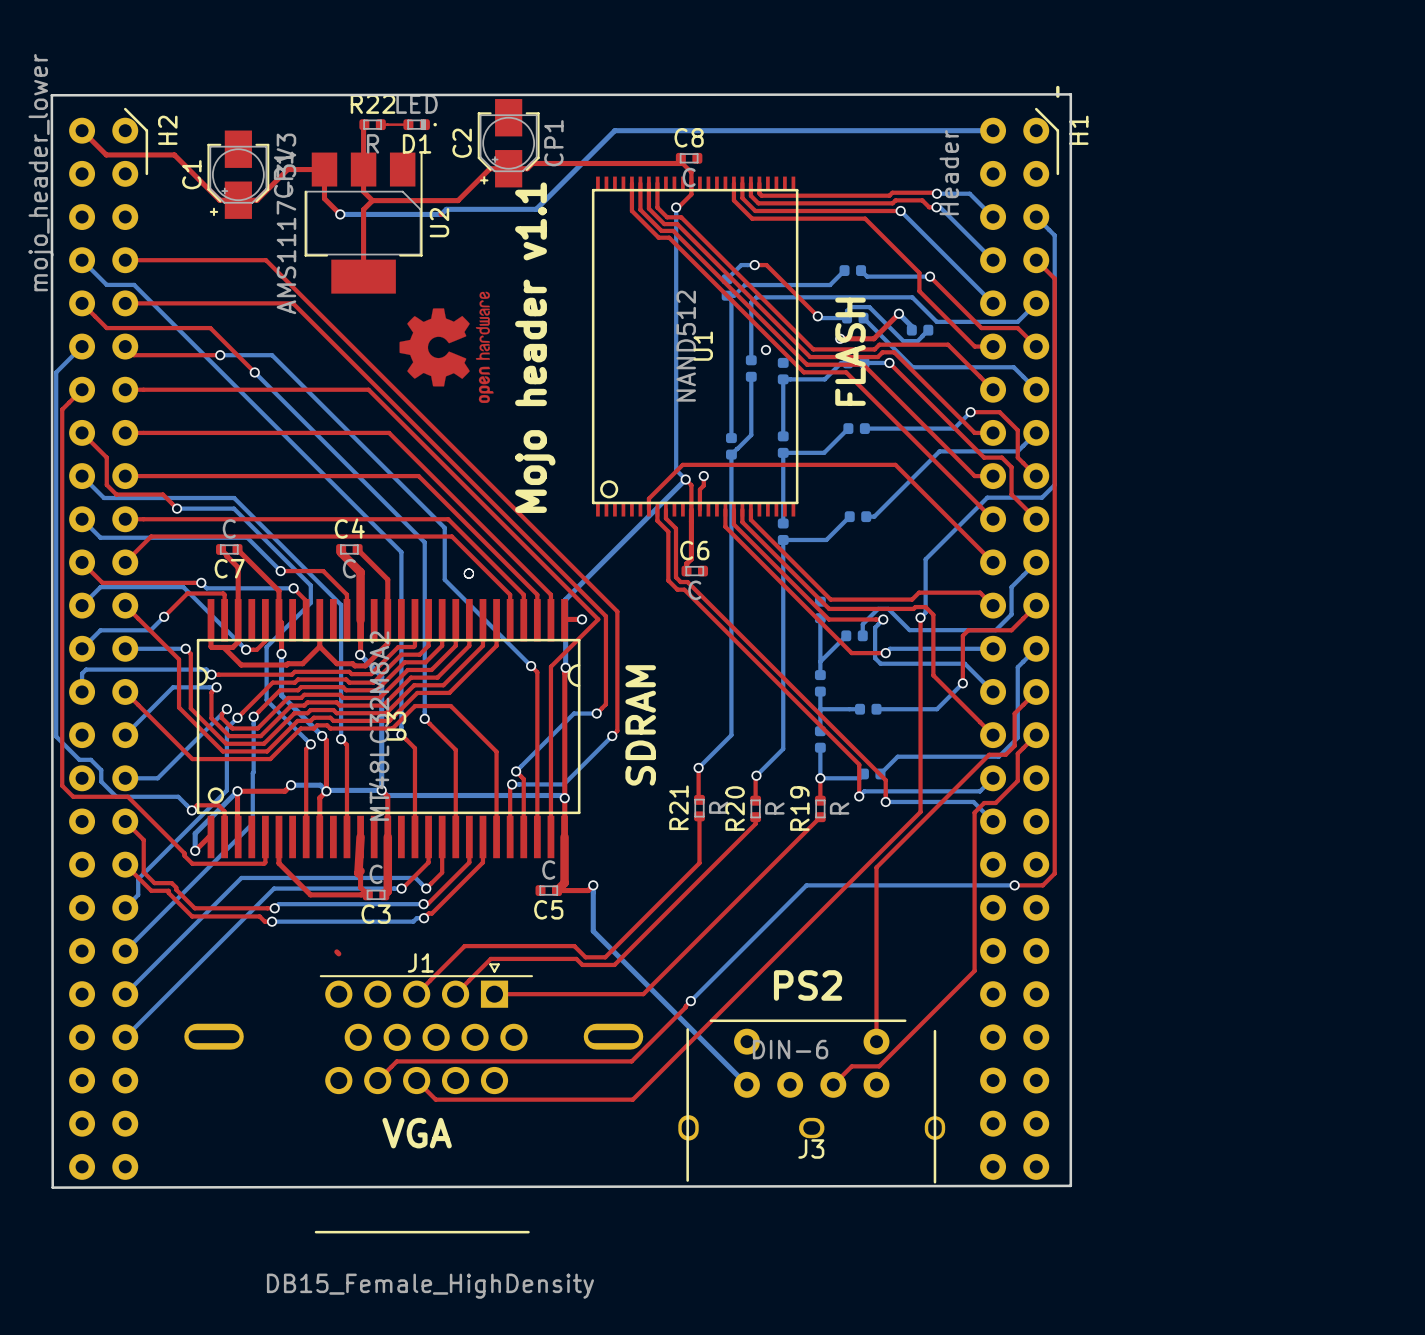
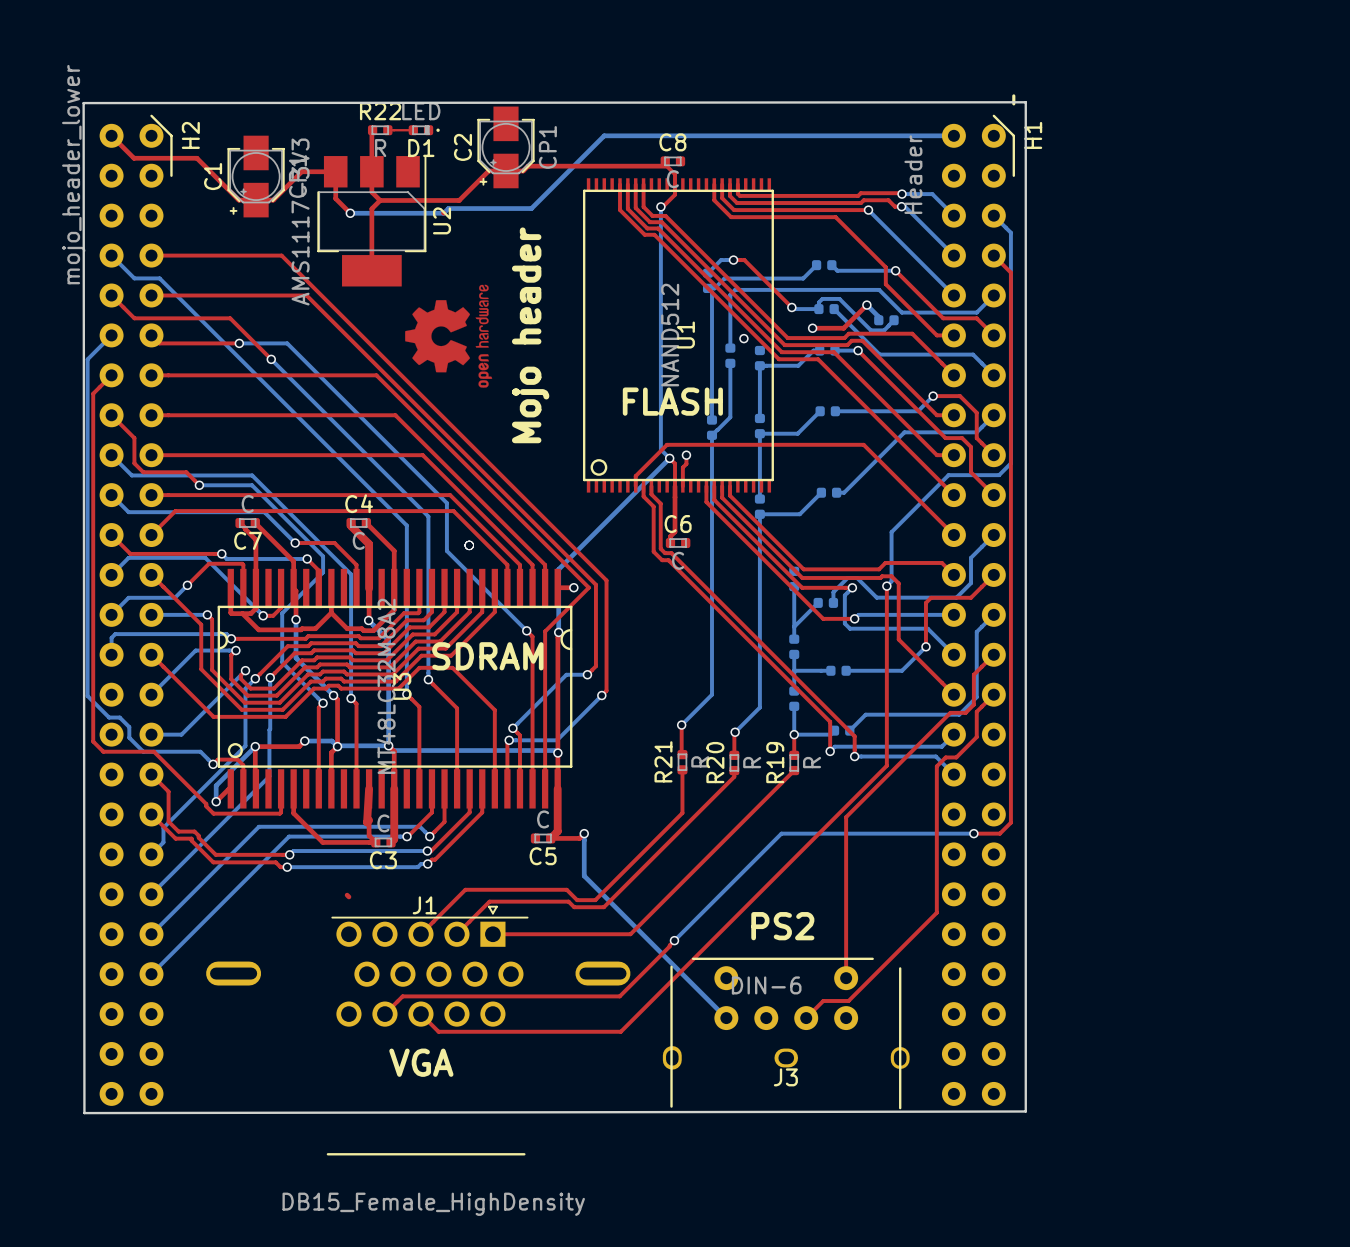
text: Mojo header v1.1 (535, 347) -> Mojo header (530, 335)
text rotation: 0° (850, 351) -> 90° clockwise (672, 401)
text position: FLASH (850, 351) -> FLASH (672, 401)
text rotation: 0° (640, 725) -> 90° clockwise (487, 656)
text position: SDRAM (640, 725) -> SDRAM (487, 656)

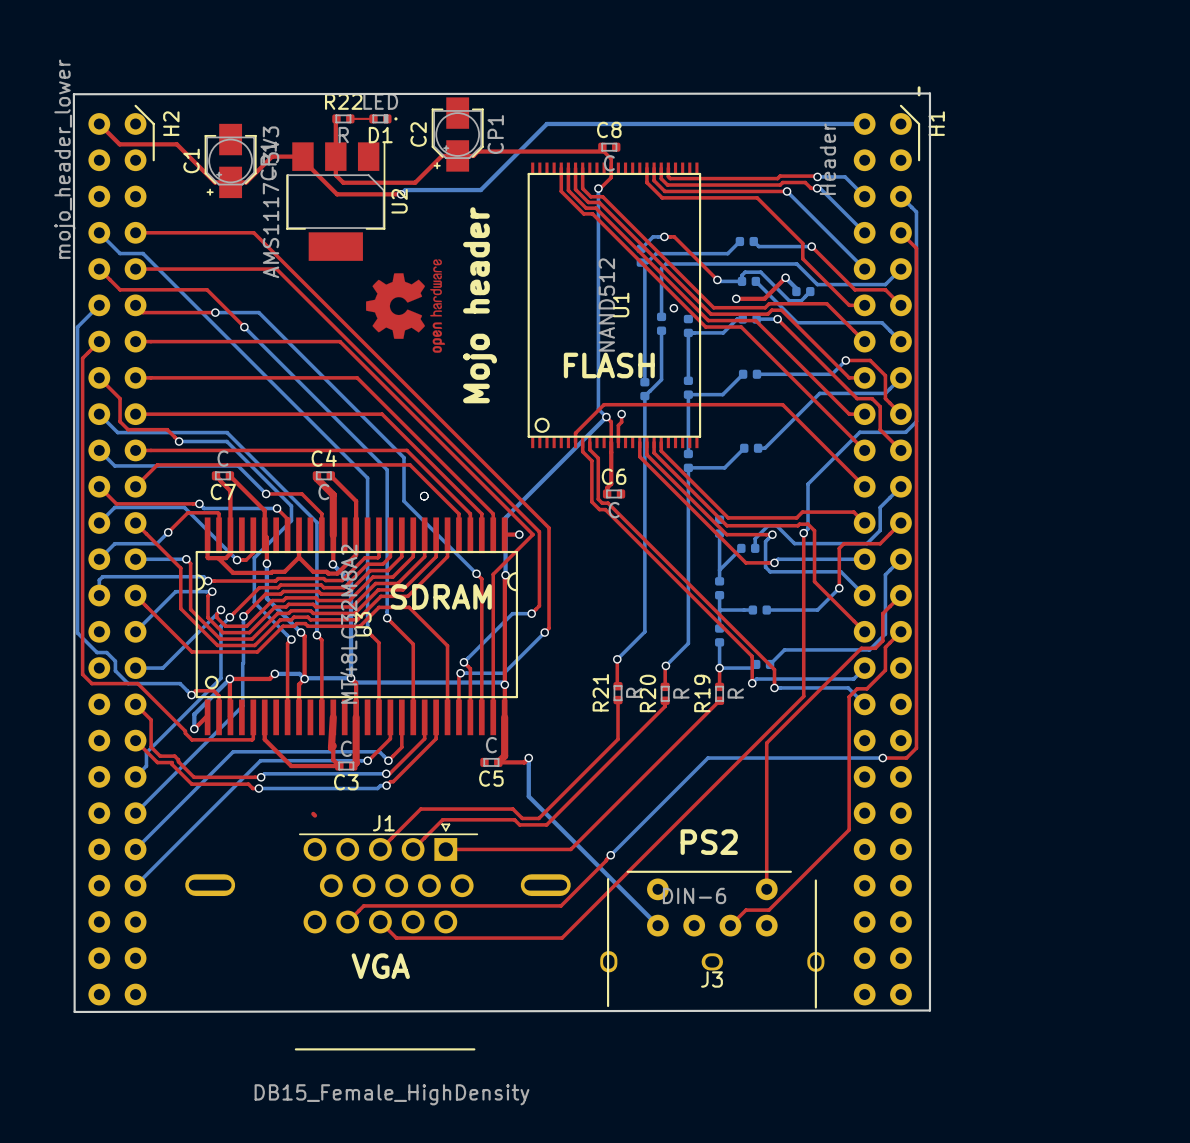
top track: (335, 175) (335, 198) (350, 213) -> (302, 160) (337, 194) (401, 194)
top track: (380, 200) (371, 208) (371, 270) -> none
bottom track: (350, 213) (443, 213) -> none
via position: (350, 213) -> (401, 194)

